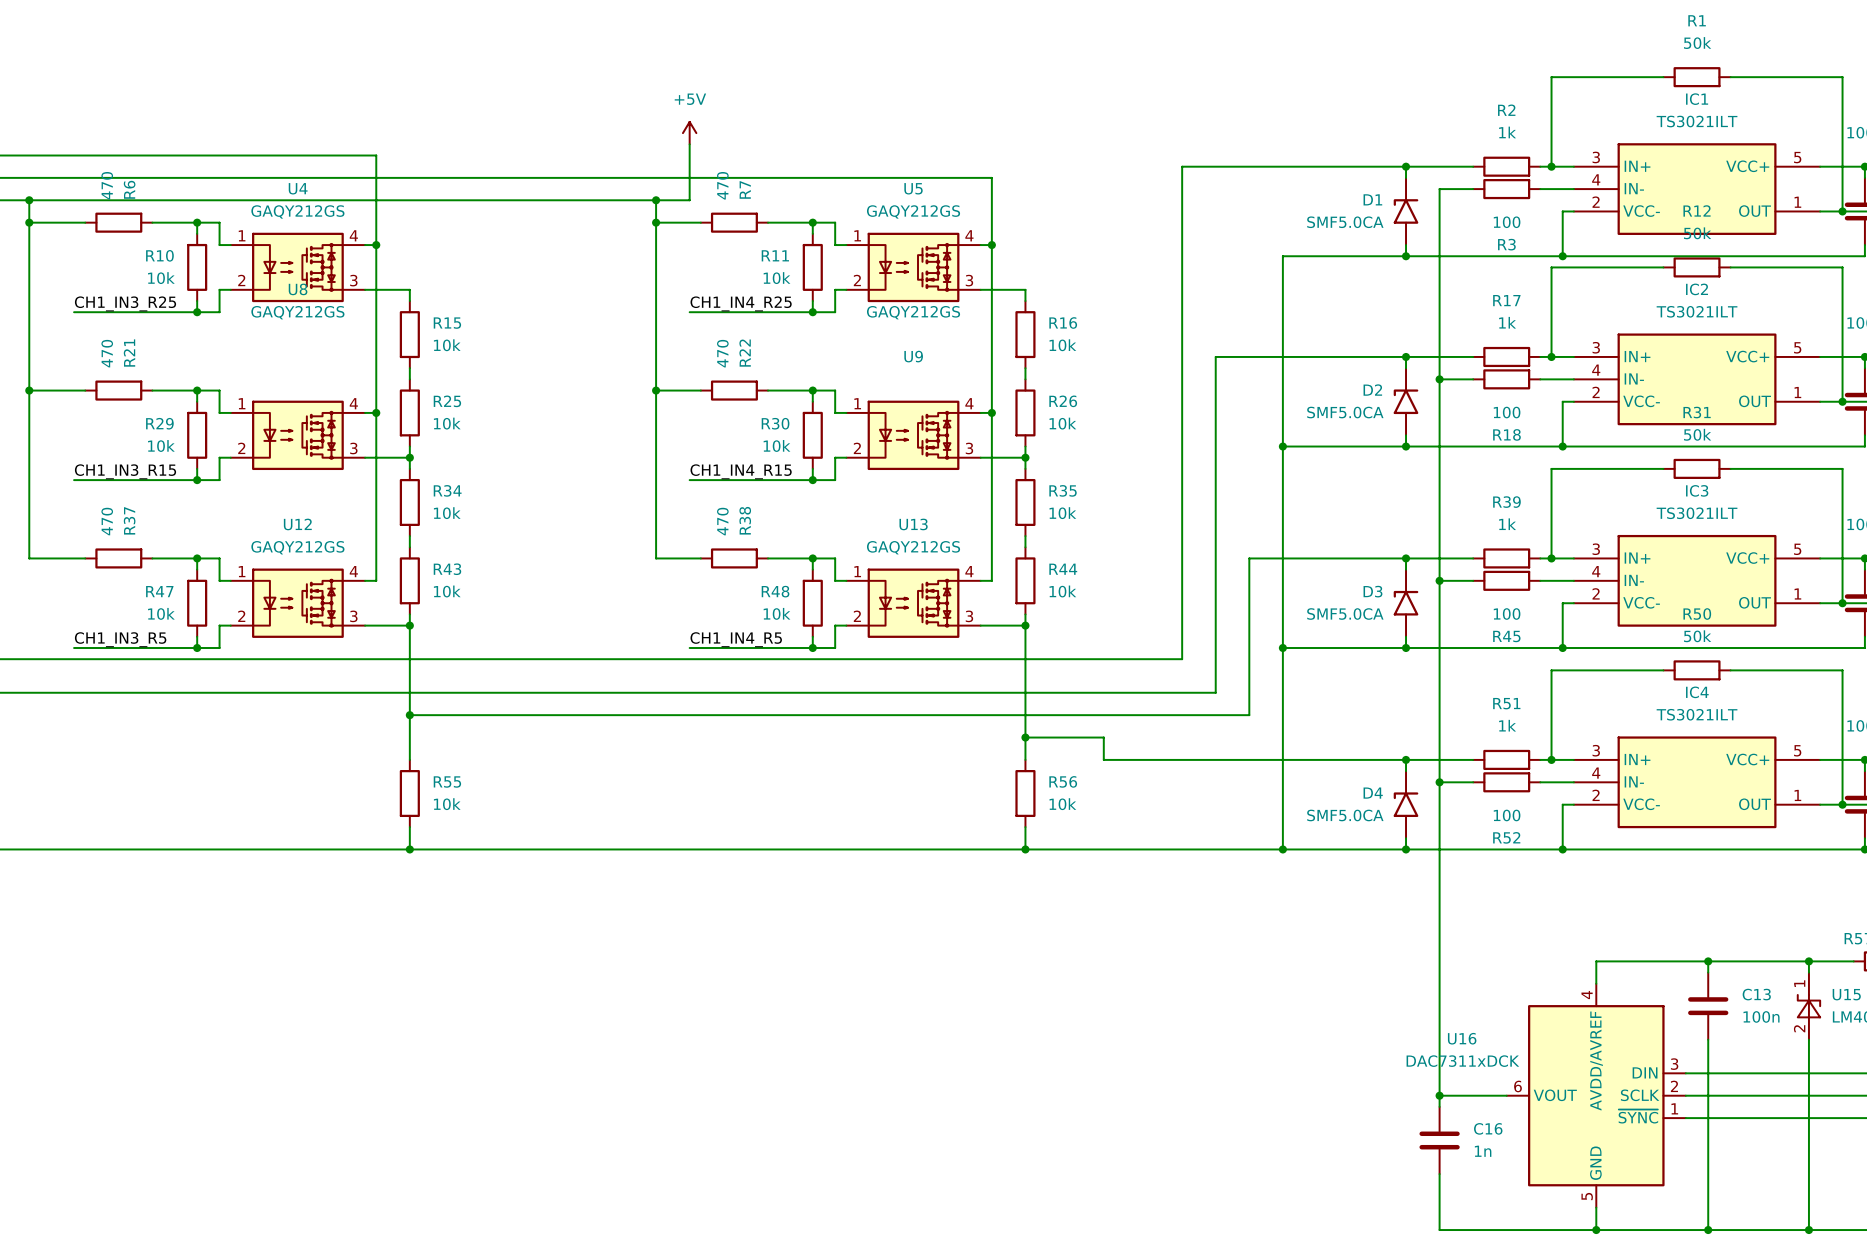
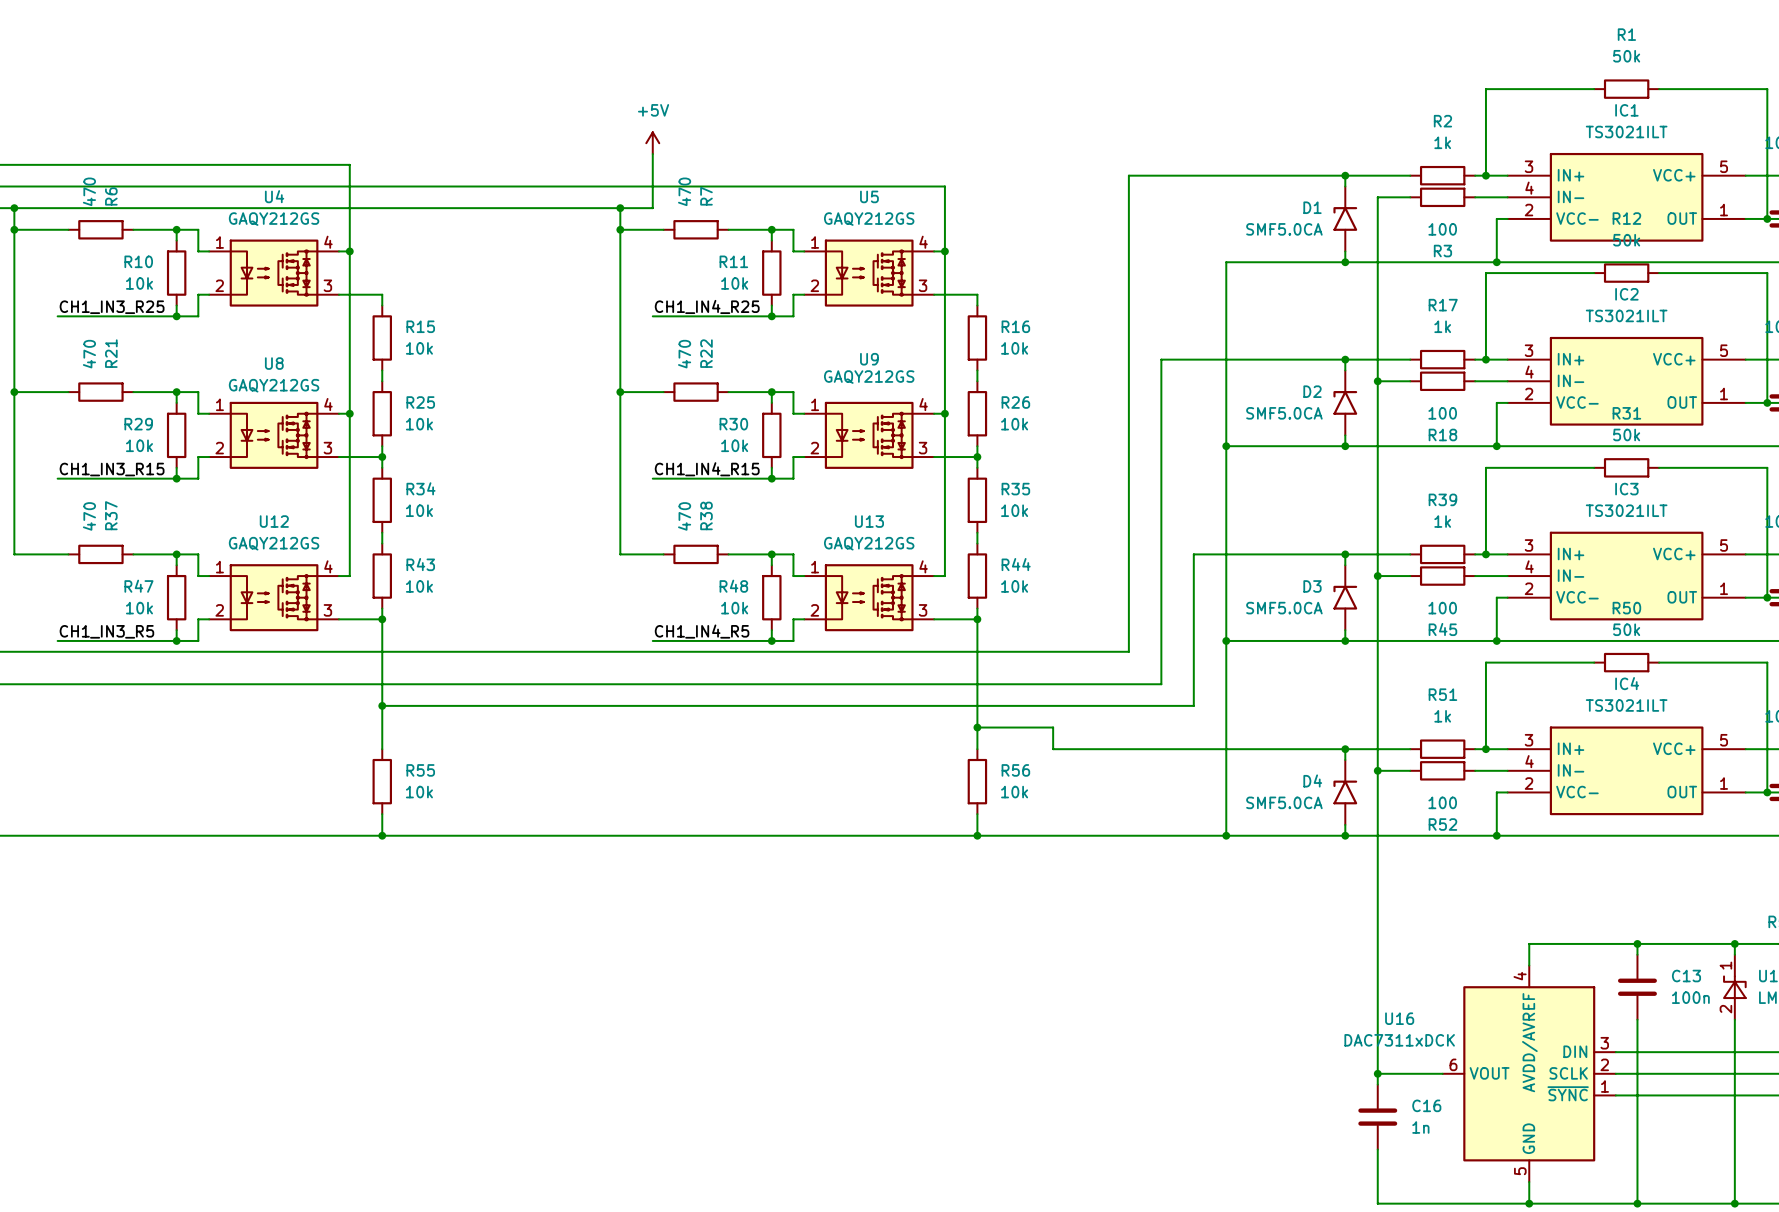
U8 name position: U8 (298, 289) -> U8 (274, 363)
U8 value position: GAQY212GS (297, 312) -> GAQY212GS (274, 385)
U9 value position: GAQY212GS (913, 312) -> GAQY212GS (869, 377)

